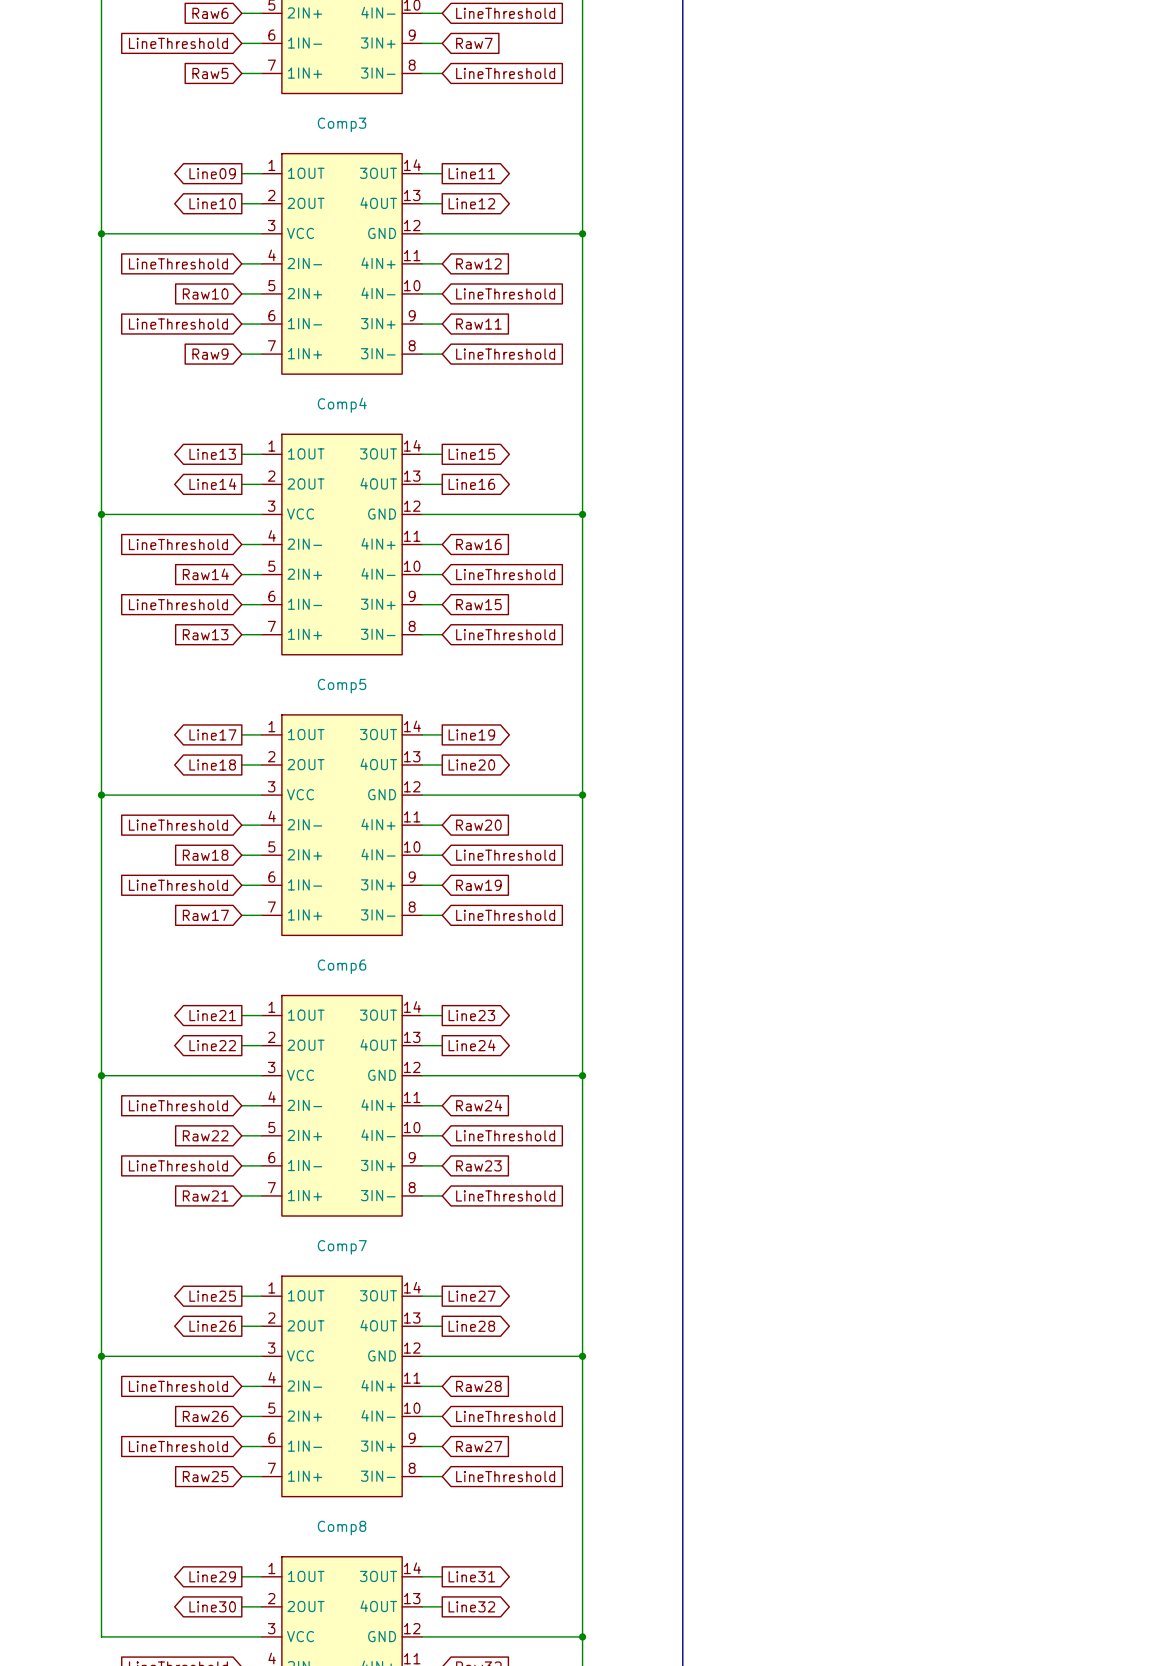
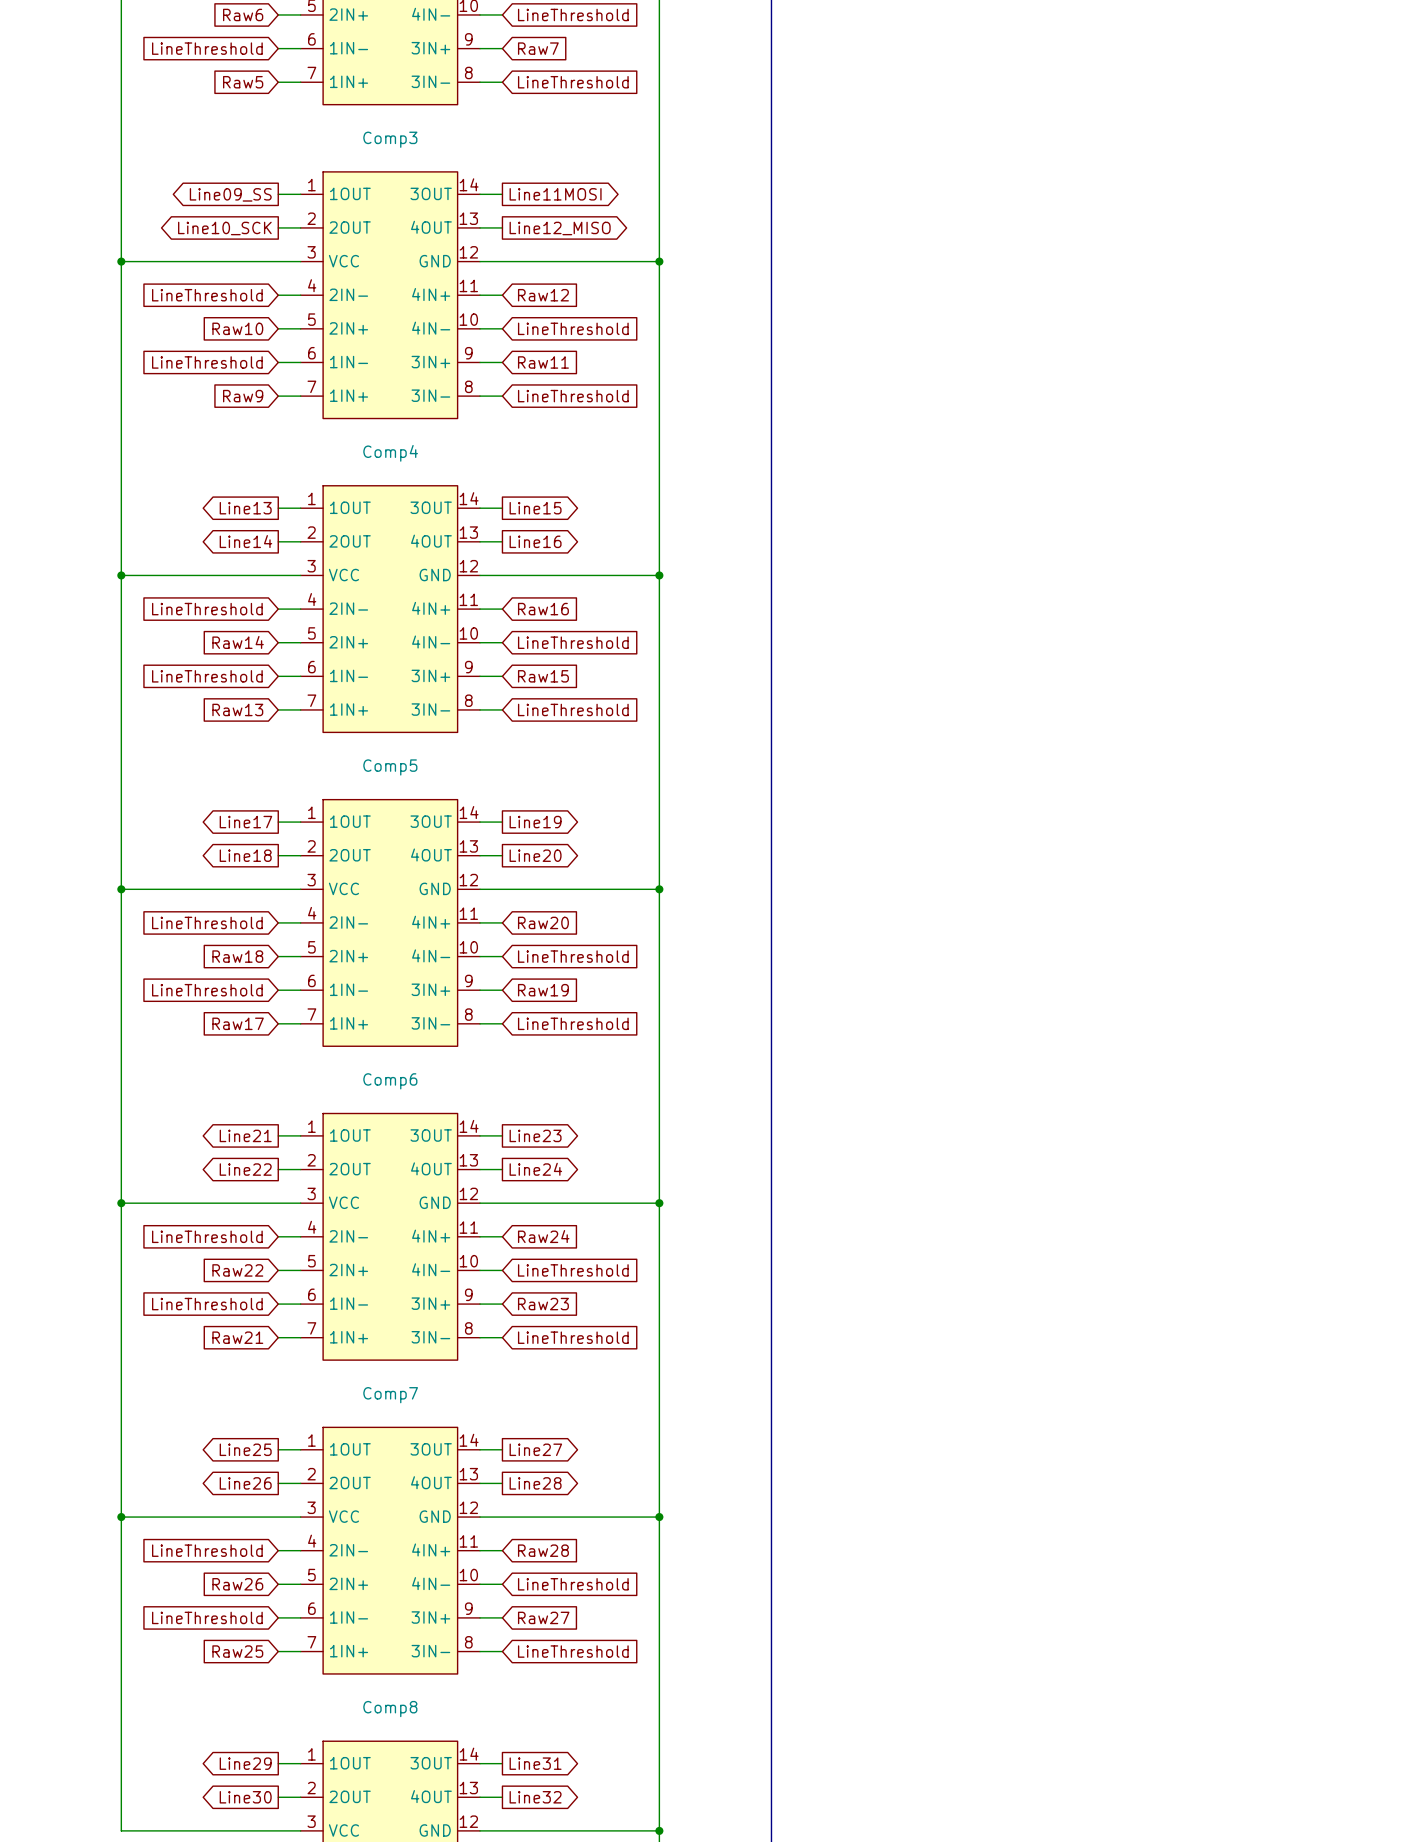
global label: Line09 (212, 173) -> Line09_SS (230, 194)
global label: Line11 (471, 173) -> Line11MOSI (555, 194)
global label: Line10 (212, 203) -> Line10_SCK (224, 228)
global label: Line12 (471, 203) -> Line12_MISO (560, 228)

